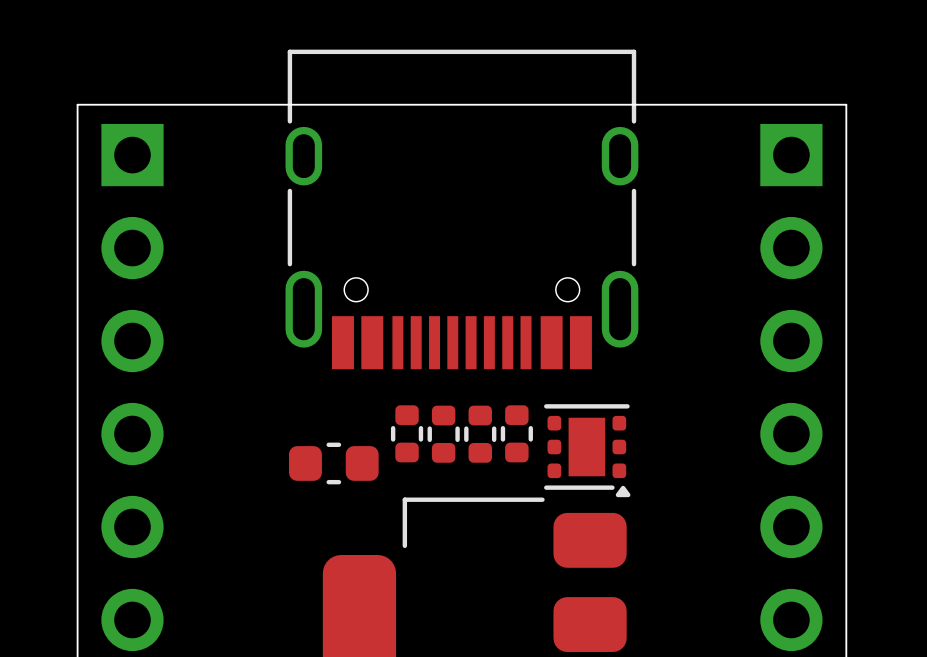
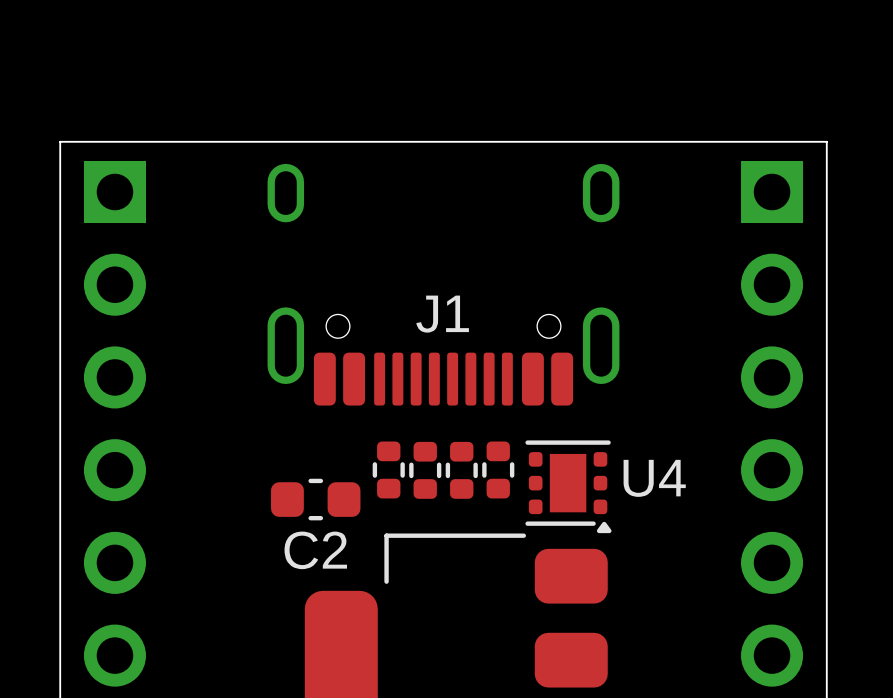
part: (461, 209) -> none
J1: none -> (443, 284)
U4 name: none -> U4 (654, 478)
C2 name: none -> C2 (315, 550)

